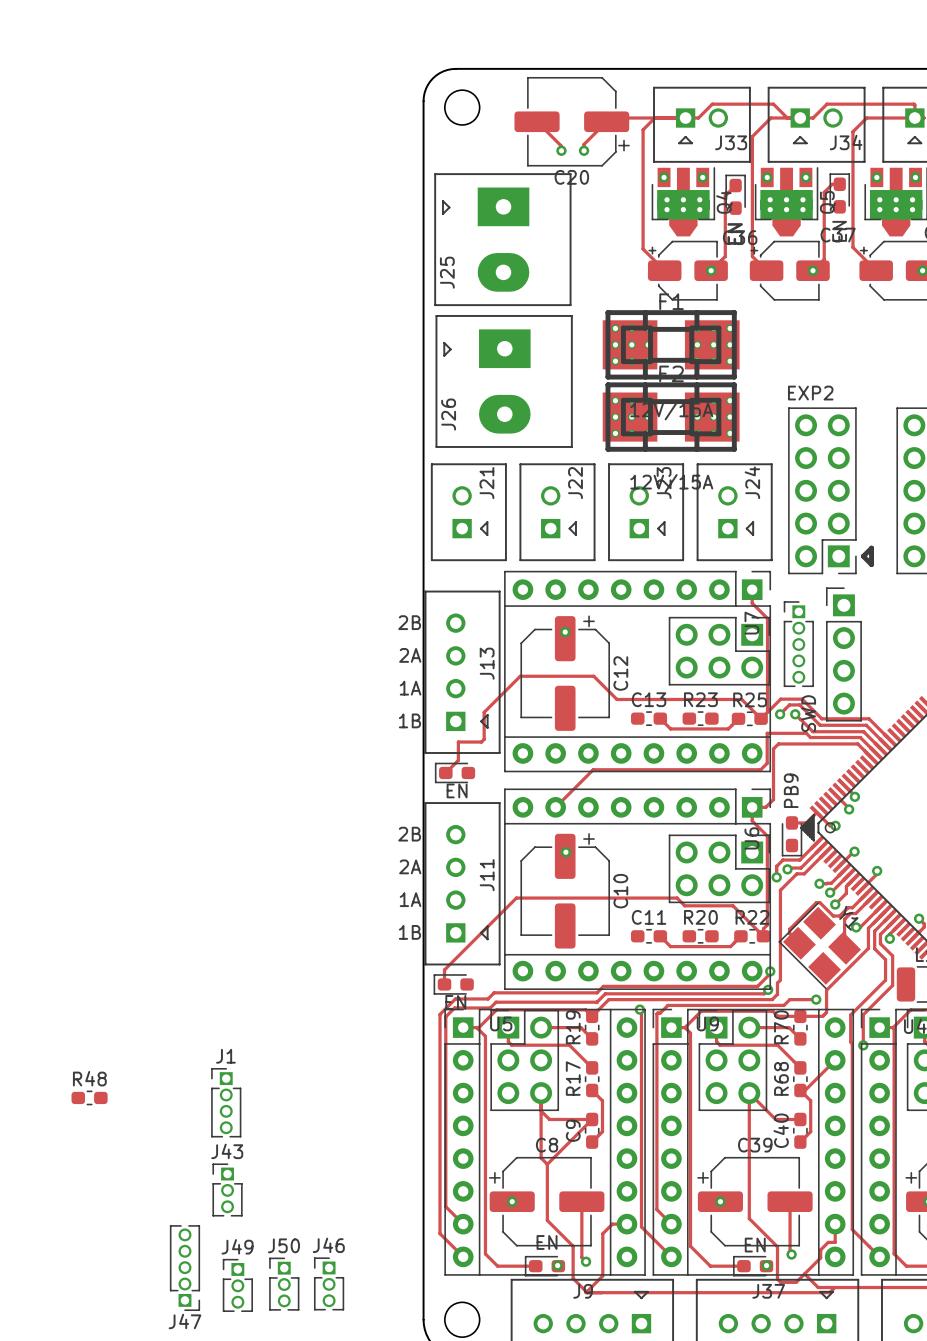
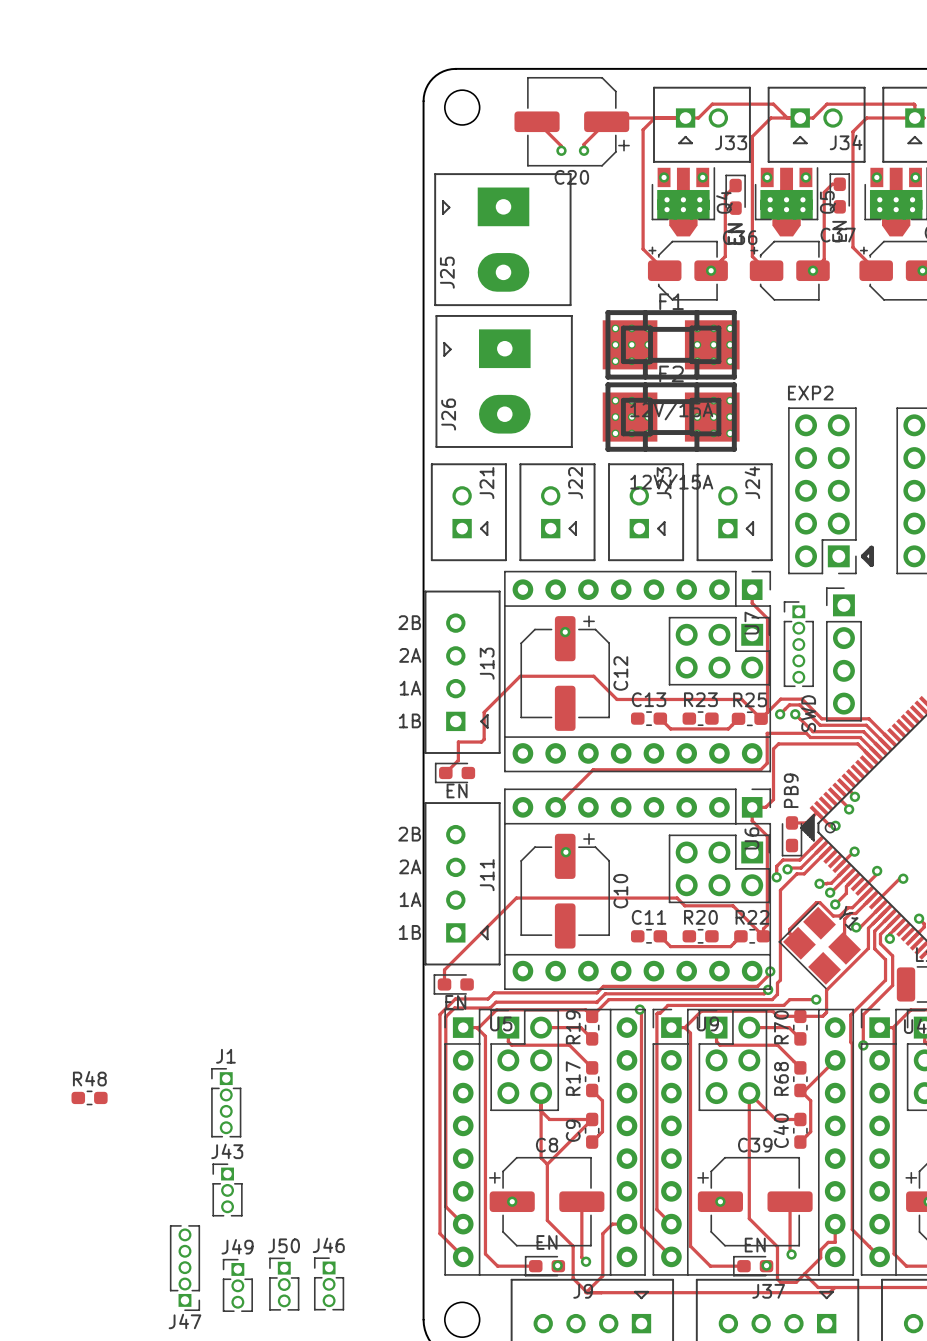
track: none -> (903, 878) (899, 878) (876, 902)
via: none -> (903, 878)

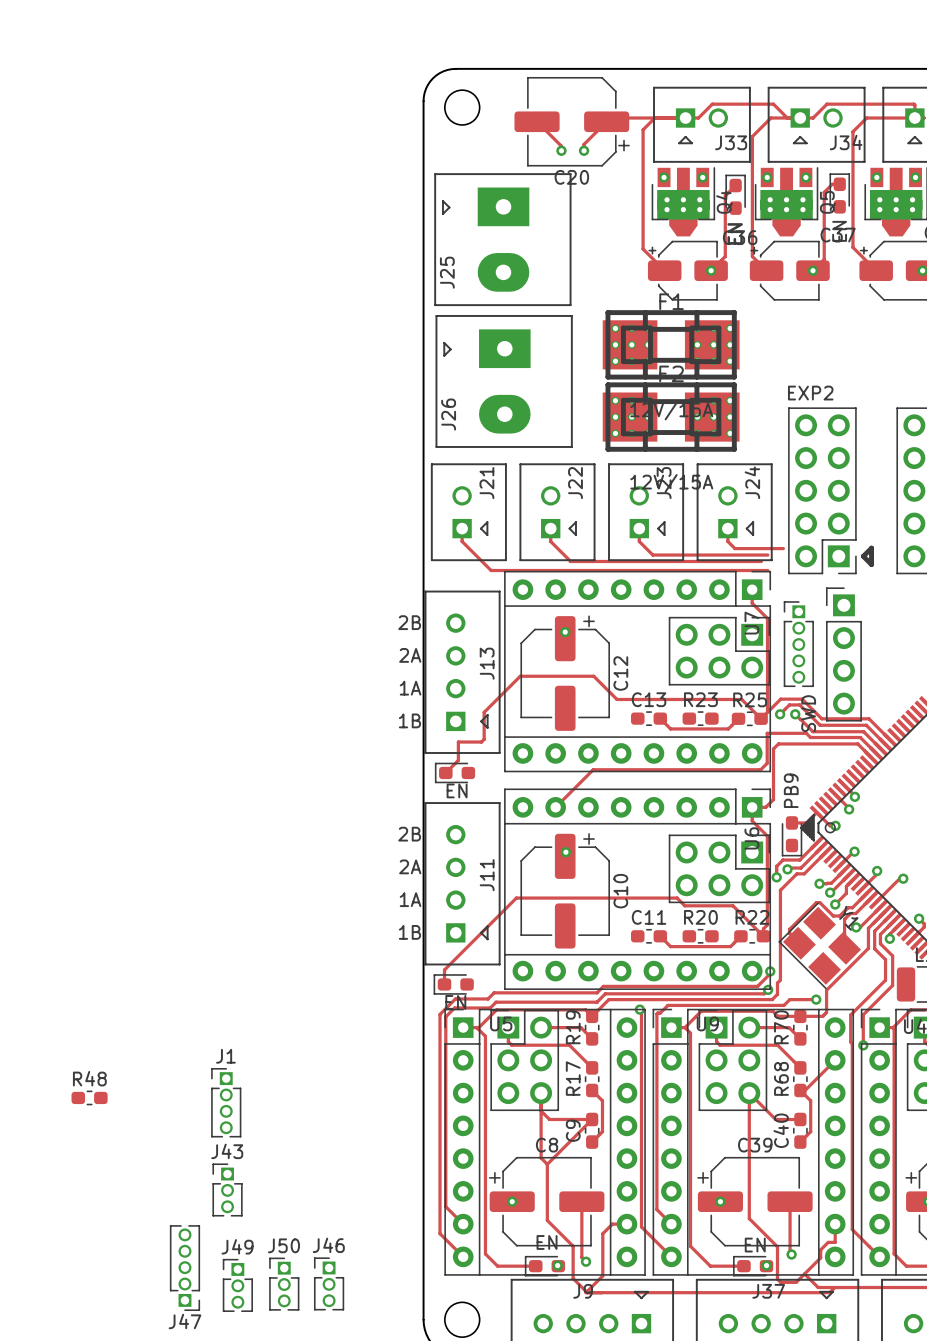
track: none -> (462, 528) (462, 541) (491, 570) (767, 570)
track: none -> (550, 528) (550, 541) (570, 561) (761, 561)
track: none -> (639, 528) (639, 541) (652, 555) (767, 555)
track: none -> (727, 528) (727, 541) (734, 548) (783, 548)

